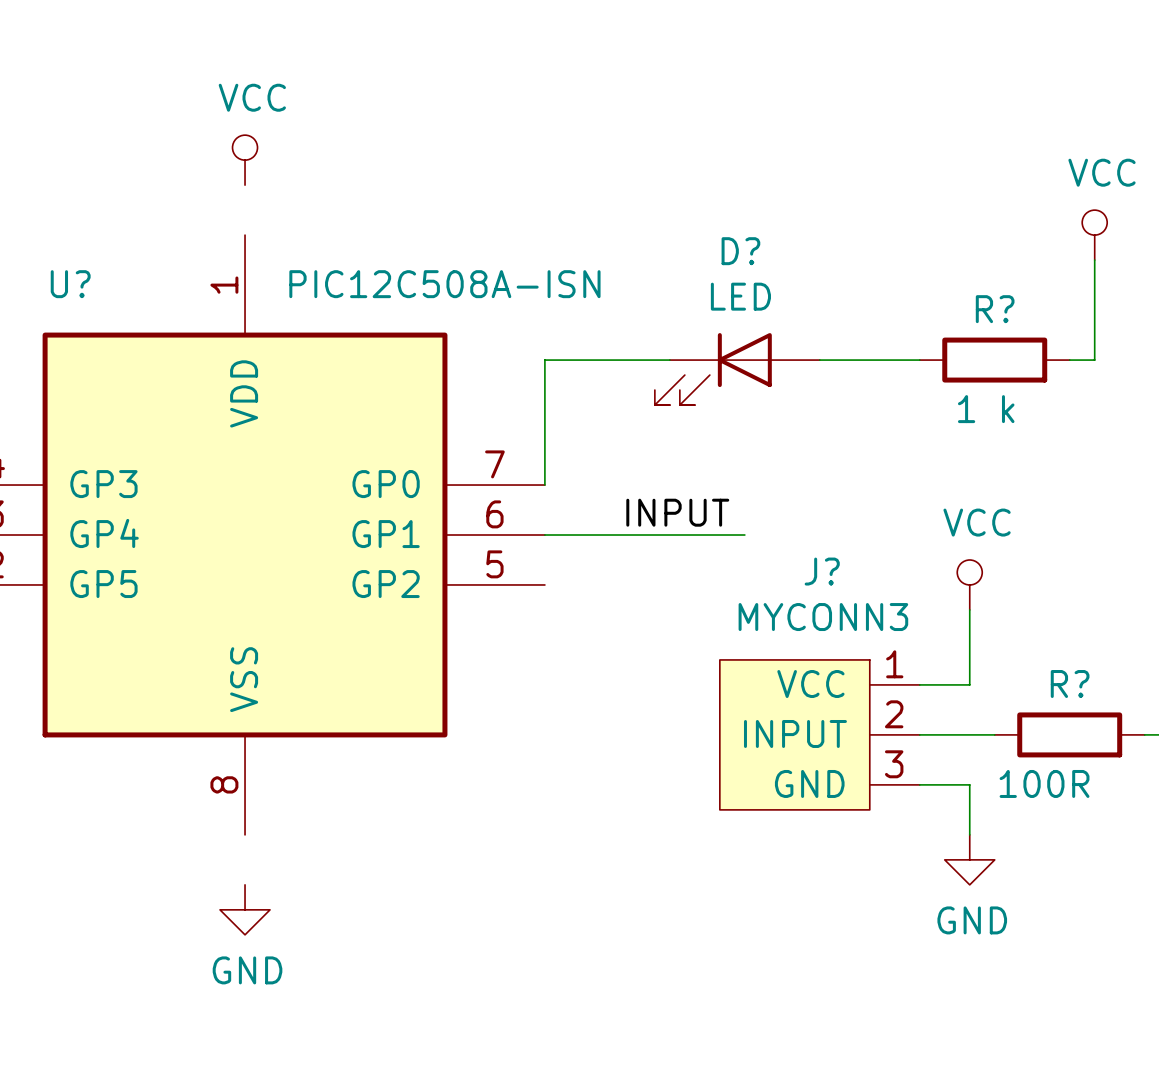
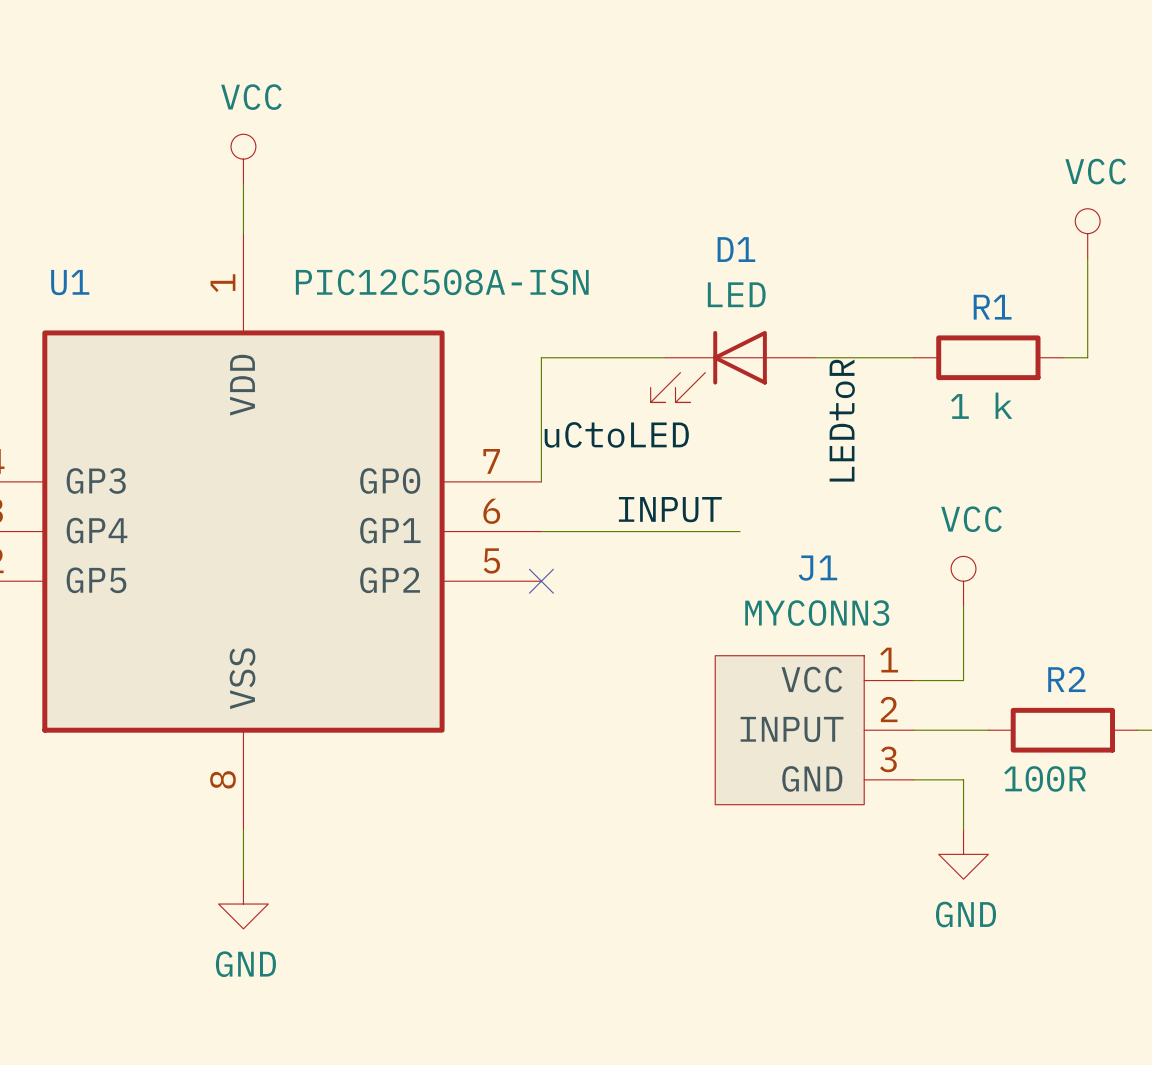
wire: none -> (243, 183) (243, 233)
D? name: D? (740, 251) -> D1 (736, 249)
U? name: U? (70, 284) -> U1 (70, 282)
R? name: R? (995, 309) -> R1 (992, 307)
label: none -> LEDtoR (842, 420)
label: none -> uCtoLED (616, 434)
J? name: J? (822, 571) -> J1 (818, 568)
no-connect mark: none -> (541, 581)
R? name: R? (1070, 684) -> R2 (1066, 679)
wire: none -> (243, 829) (243, 879)

